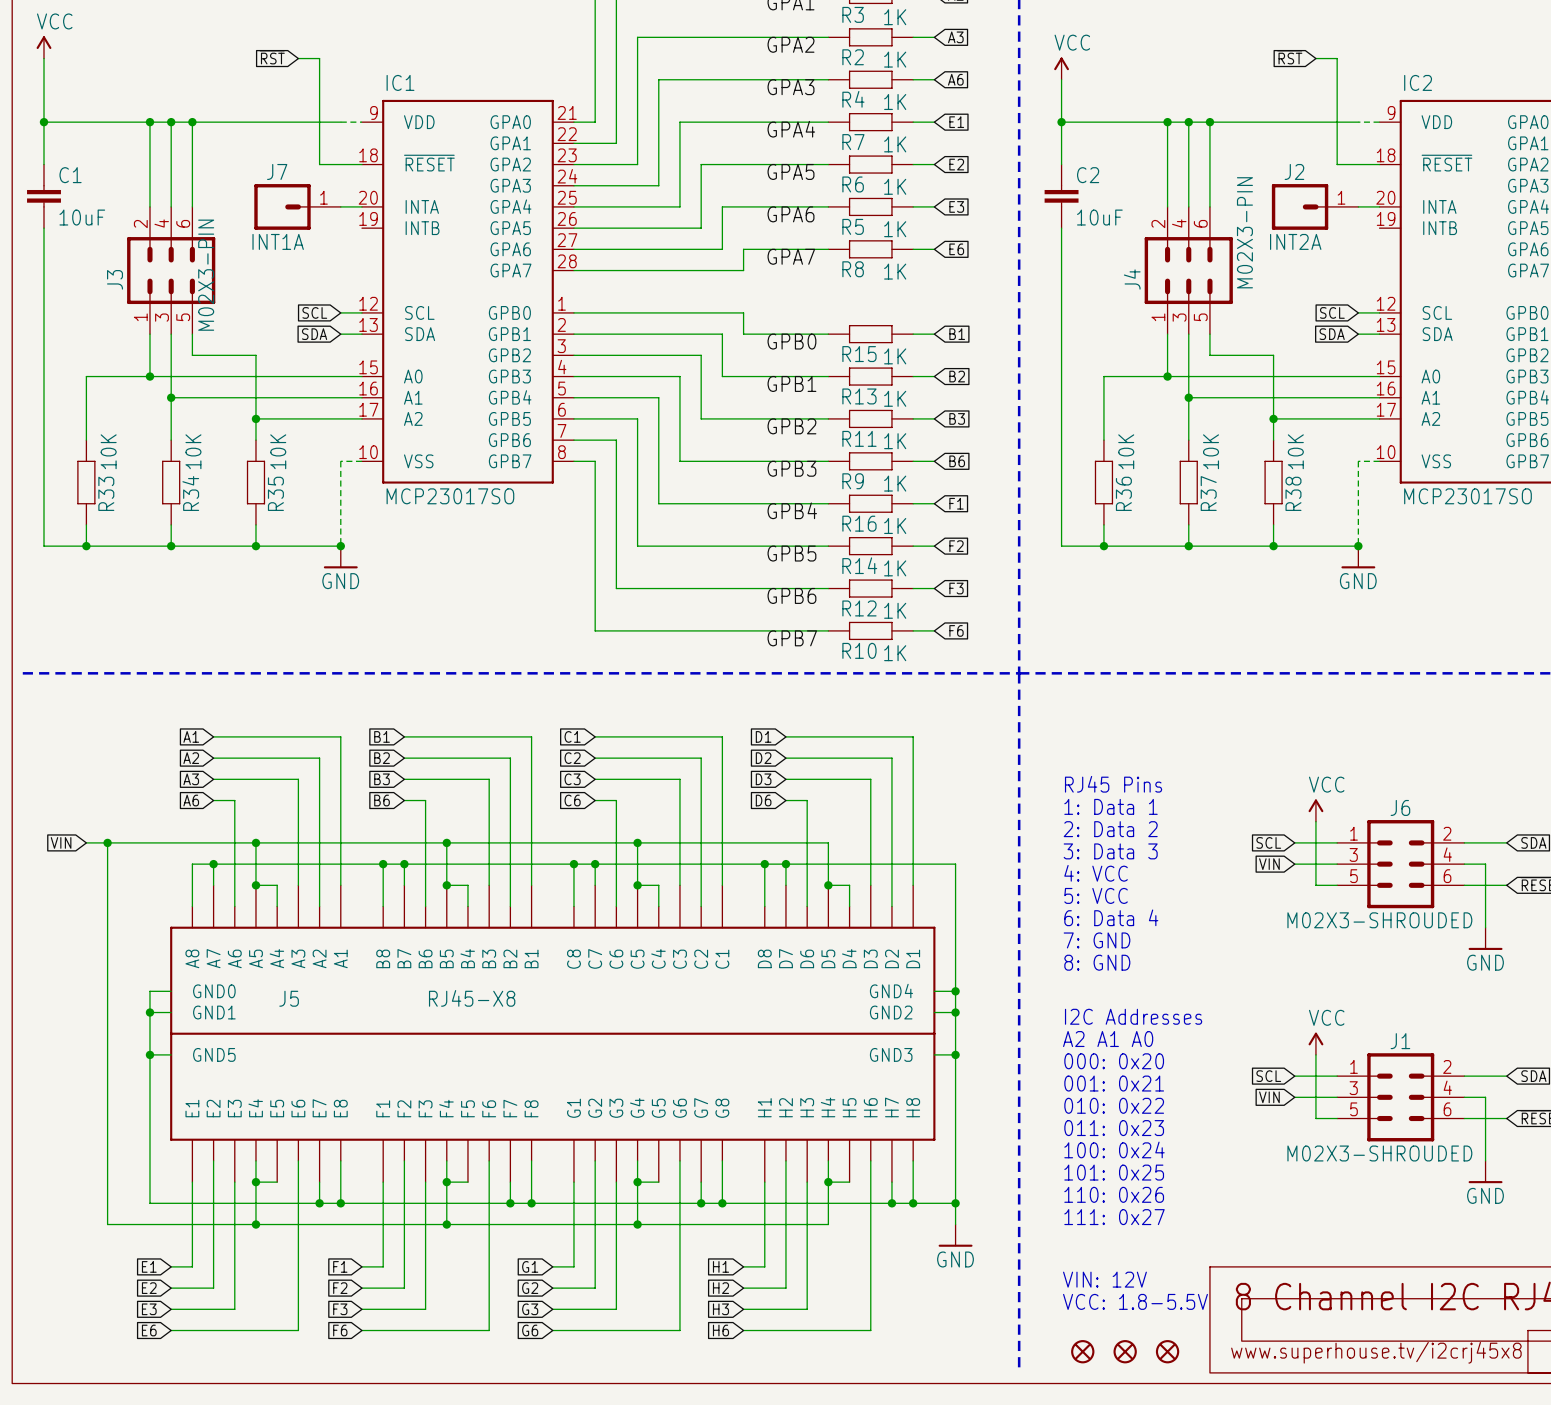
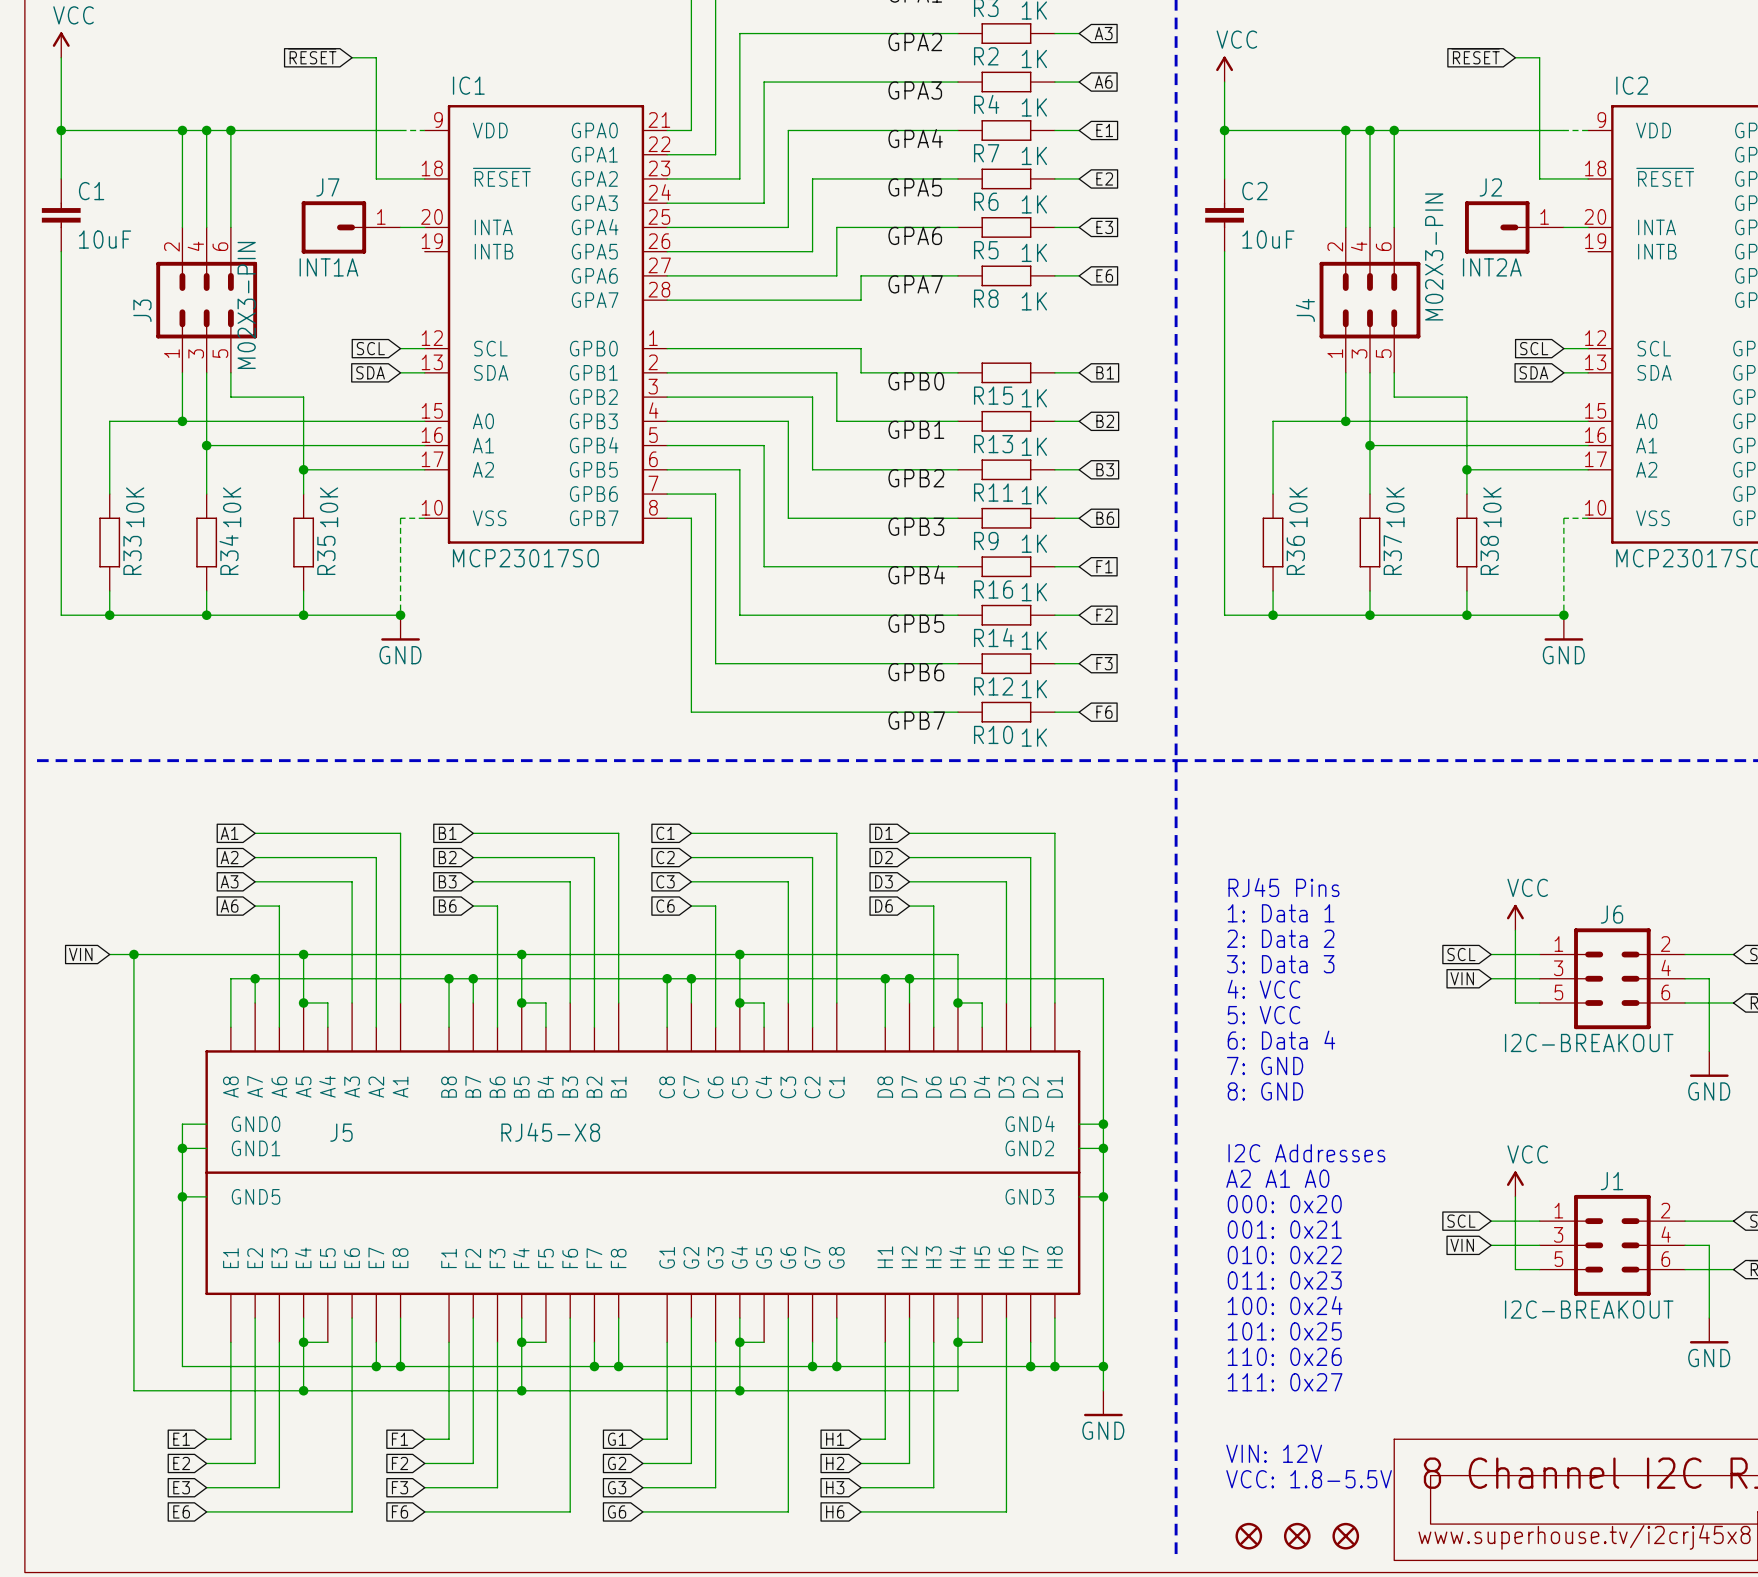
global label: ~{RST} (272, 57) -> ~{RESET} (312, 56)
global label: ~{RST} (1289, 57) -> ~{RESET} (1475, 56)
J6 value: M02X3-SHROUDED (1379, 920) -> I2C-BREAKOUT (1589, 1042)
J1 value: M02X3-SHROUDED (1379, 1153) -> I2C-BREAKOUT (1589, 1309)

